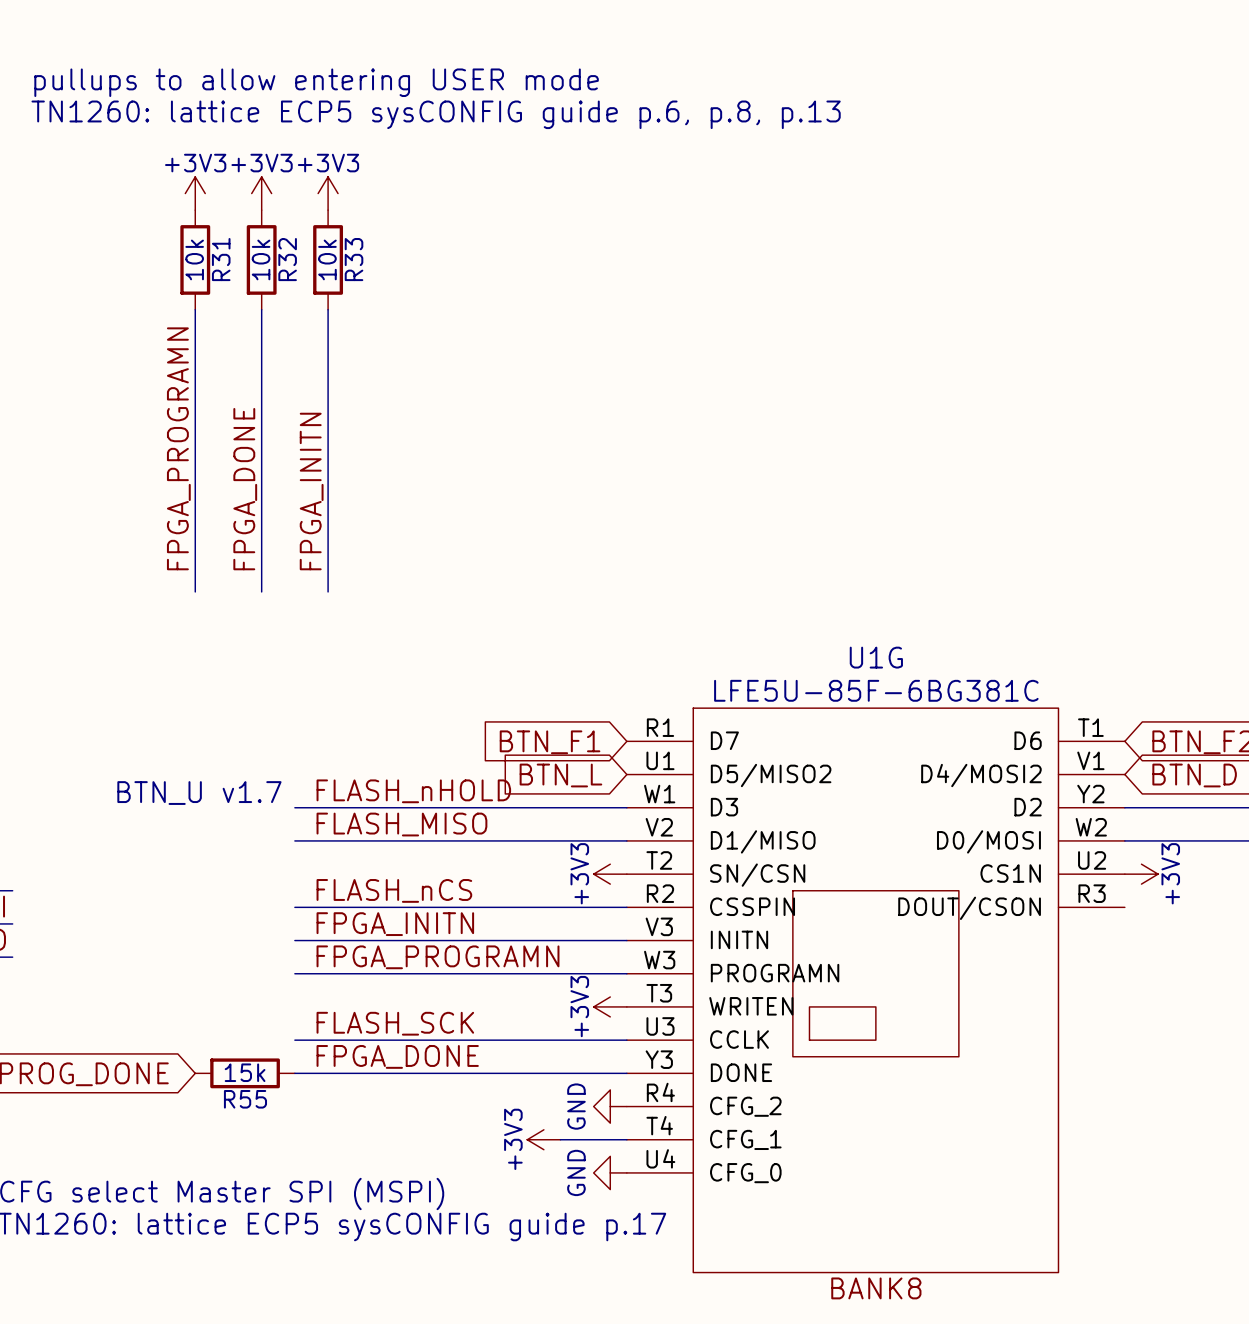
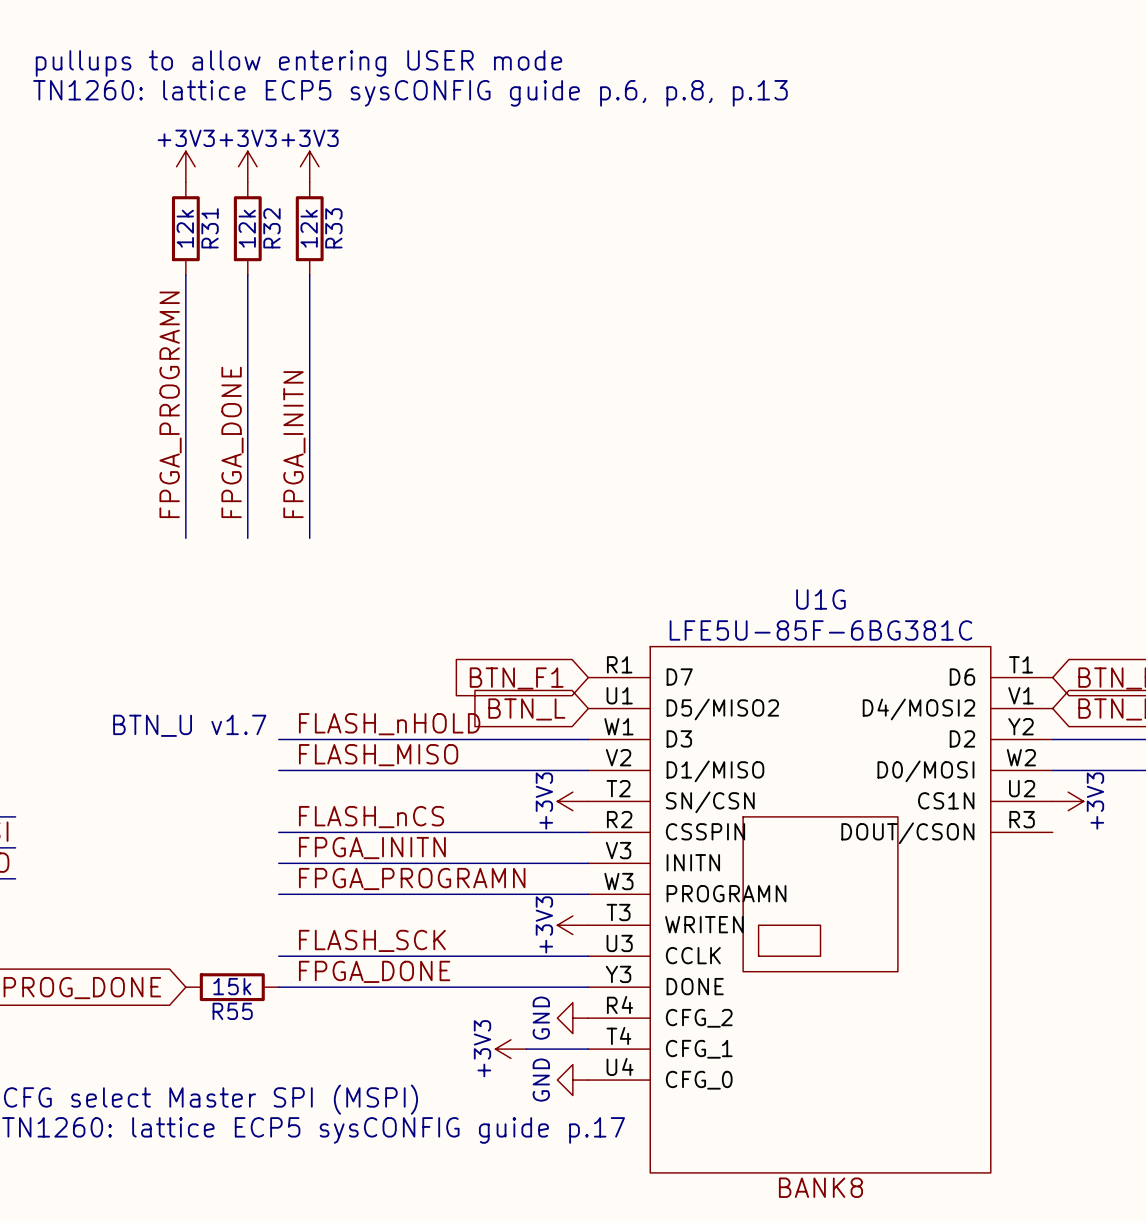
R31 value: 10k (194, 259) -> 12k (185, 228)
R32 value: 10k (261, 259) -> 12k (247, 228)
R33 value: 10k (327, 259) -> 12k (309, 228)

